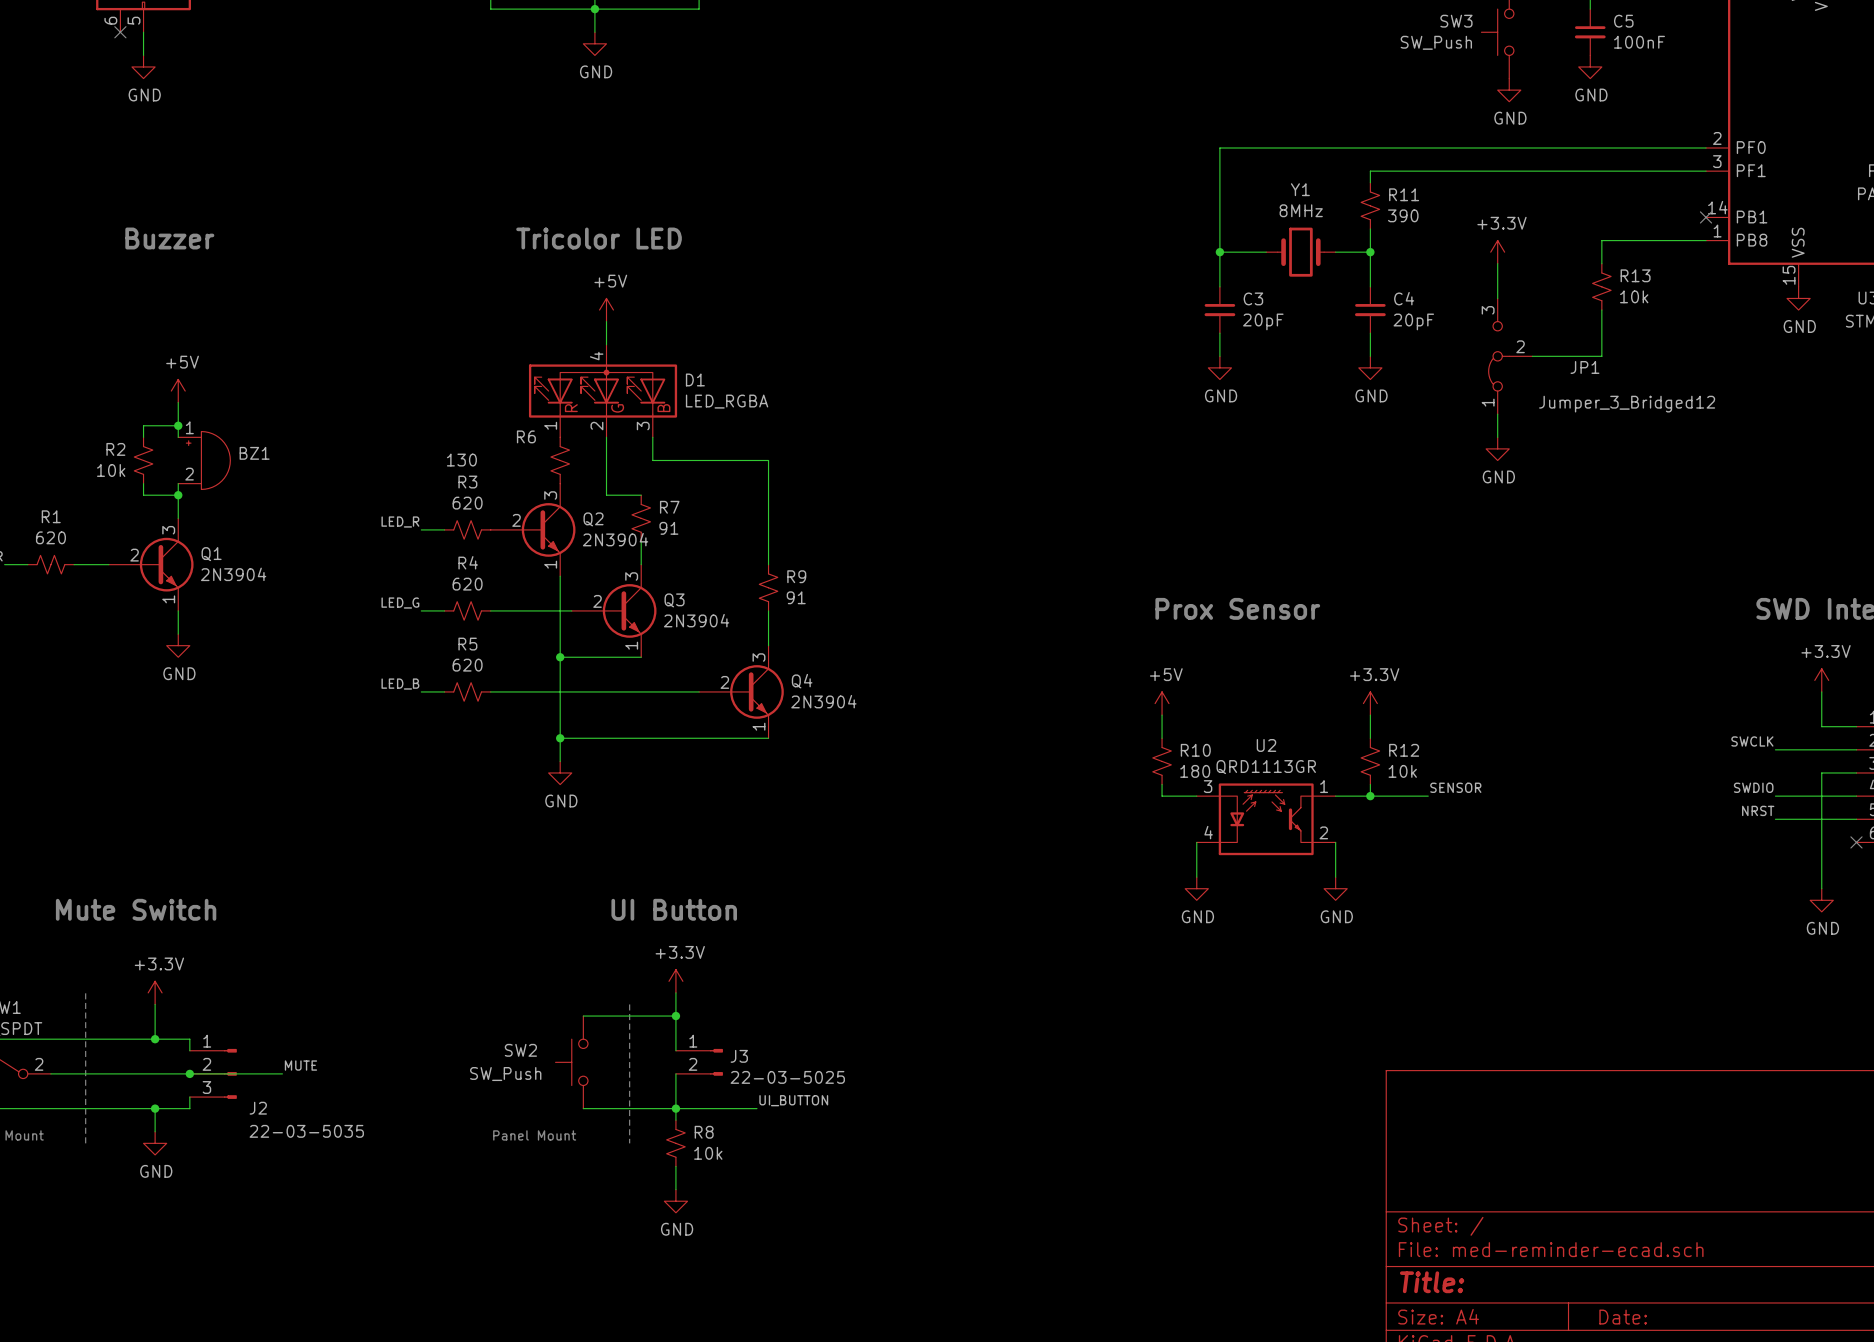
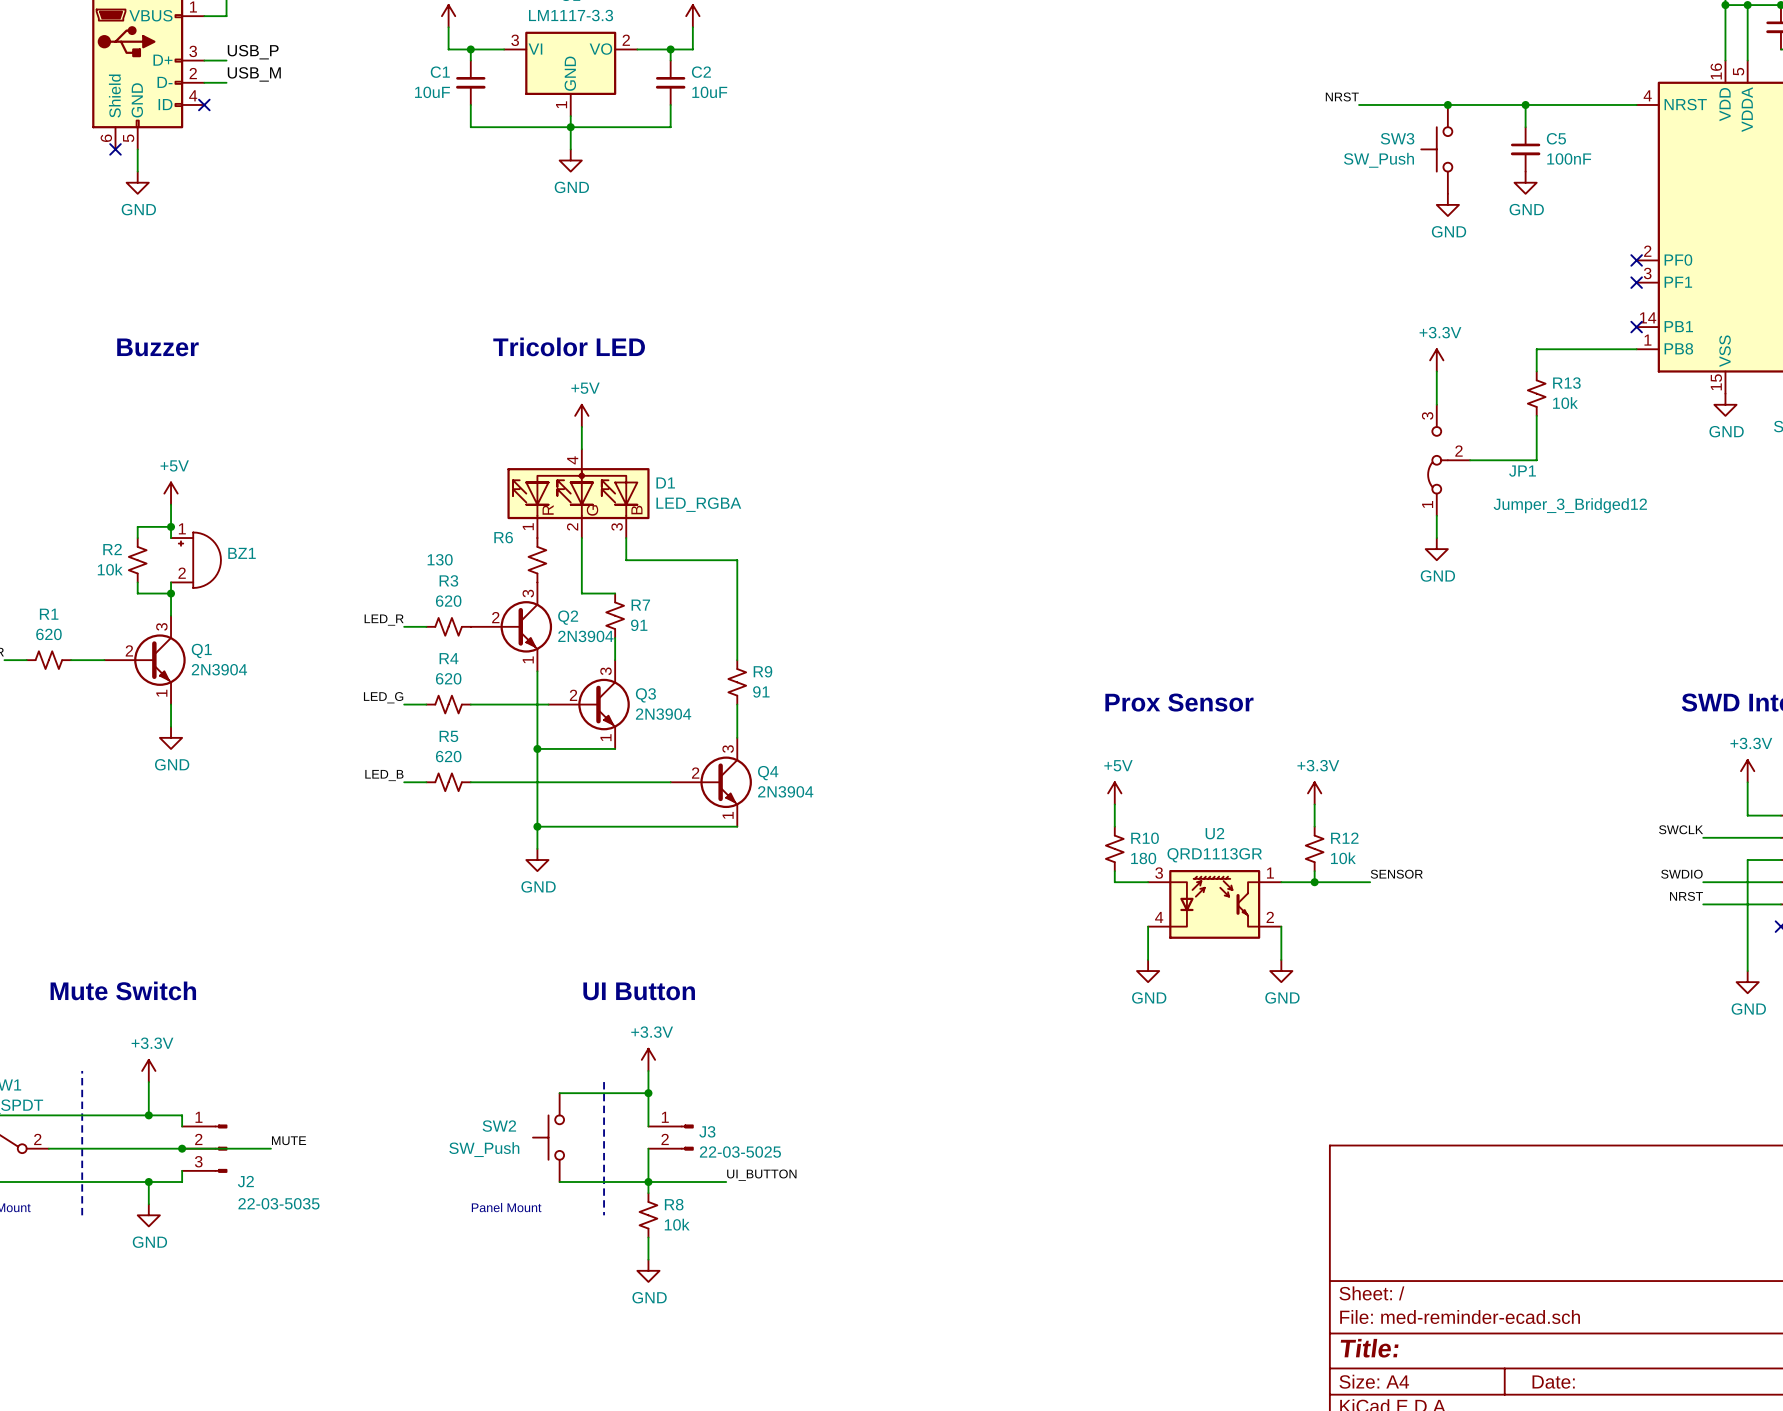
wire: (1706, 147) (1219, 147) (1219, 286) -> none
no-connect mark: none -> (1636, 260)
wire: (1706, 171) (1370, 171) (1370, 182) -> none
no-connect mark: none -> (1636, 282)
R11: 390 (1370, 205) -> none
wire: (1370, 229) (1370, 286) -> none
wire: (1219, 252) (1266, 252) -> none
junction: (1219, 252) -> none
Y1: 8MHz (1300, 252) -> none
wire: (1335, 252) (1370, 252) -> none
junction: (1370, 252) -> none
C3: 20pF (1219, 310) -> none
C4: 20pF (1370, 310) -> none
wire: (1219, 333) (1219, 356) -> none
wire: (1370, 333) (1370, 356) -> none
power symbol: GND (1219, 367) -> none
power symbol: GND (1370, 367) -> none

